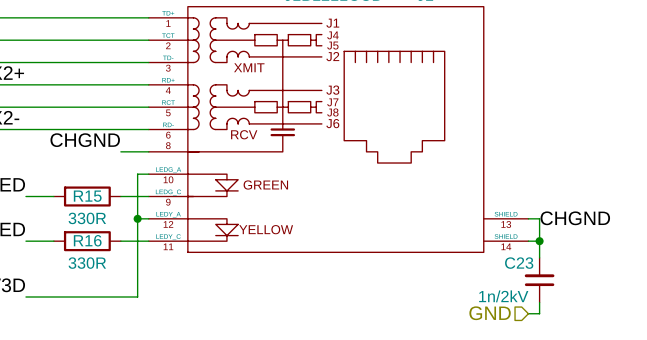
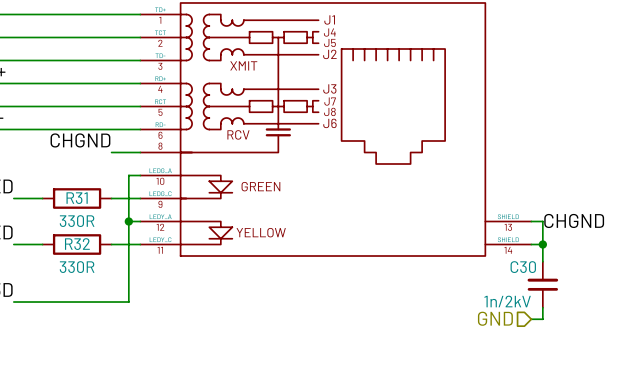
R15 name: R15 (87, 196) -> R31 (77, 198)
R16 name: R16 (87, 240) -> R32 (77, 244)
C23 name: C23 (519, 263) -> C30 (523, 267)

